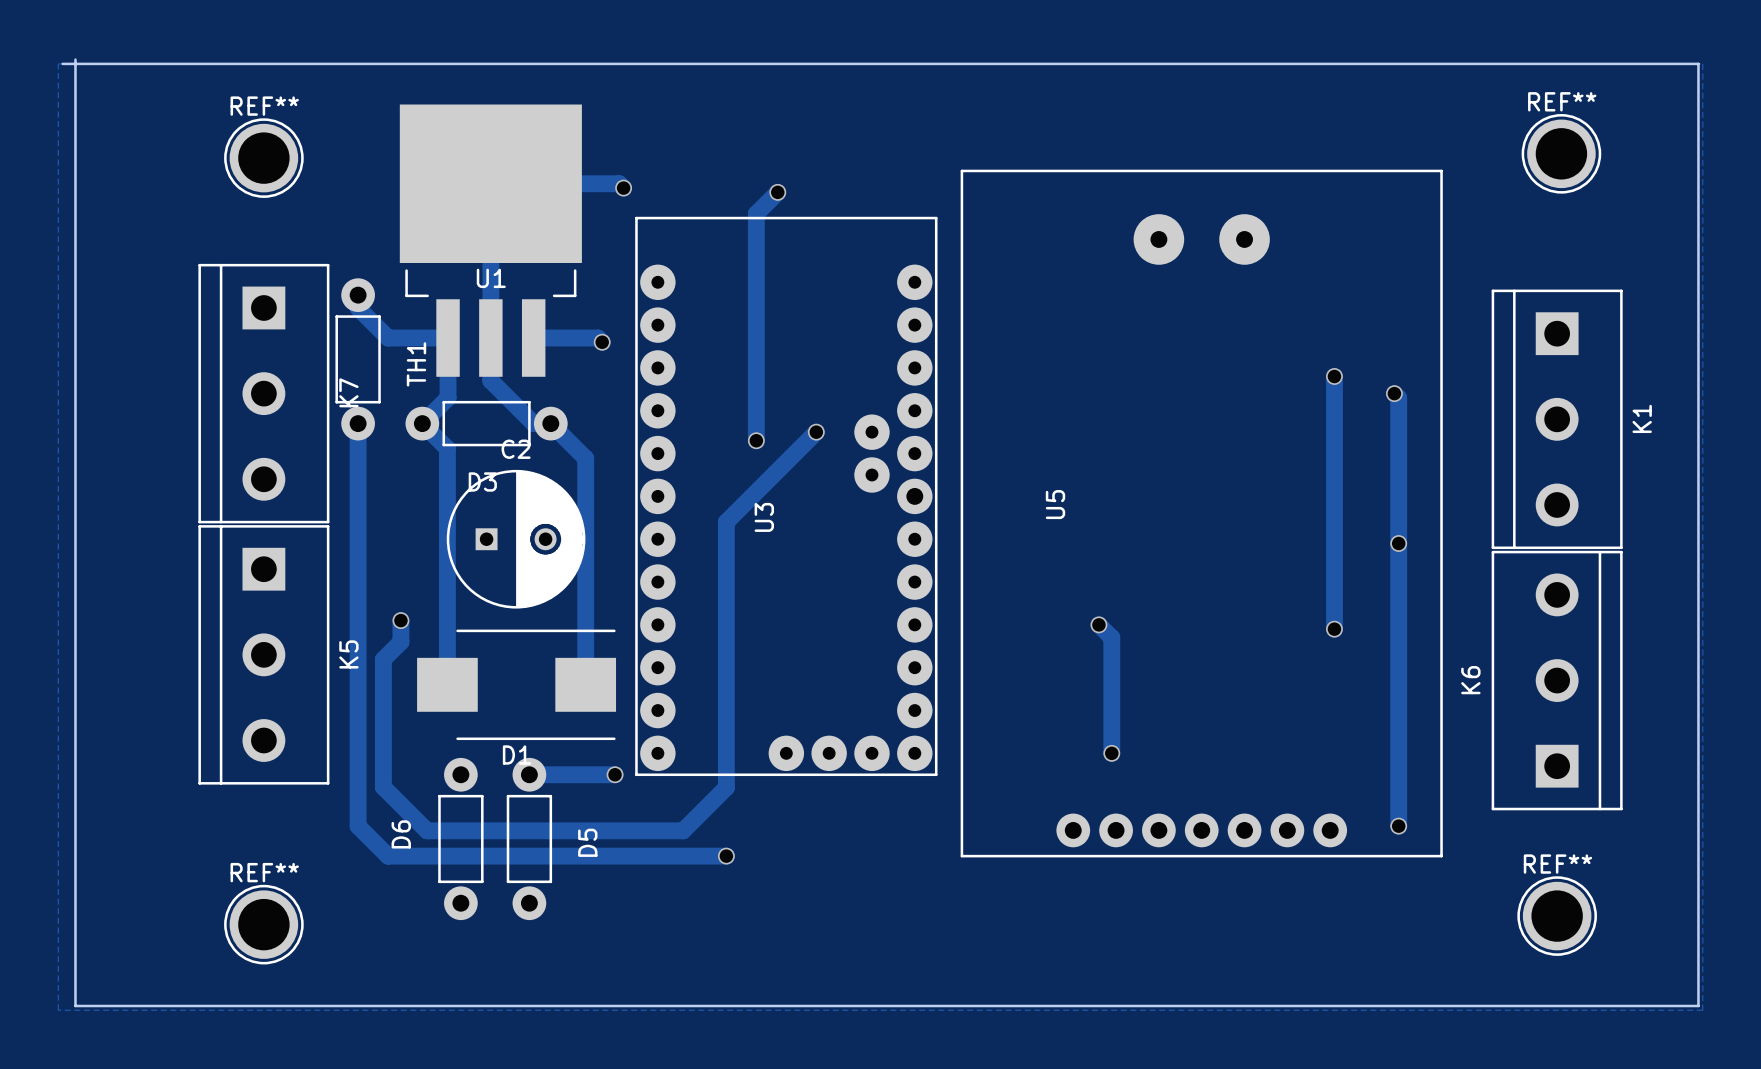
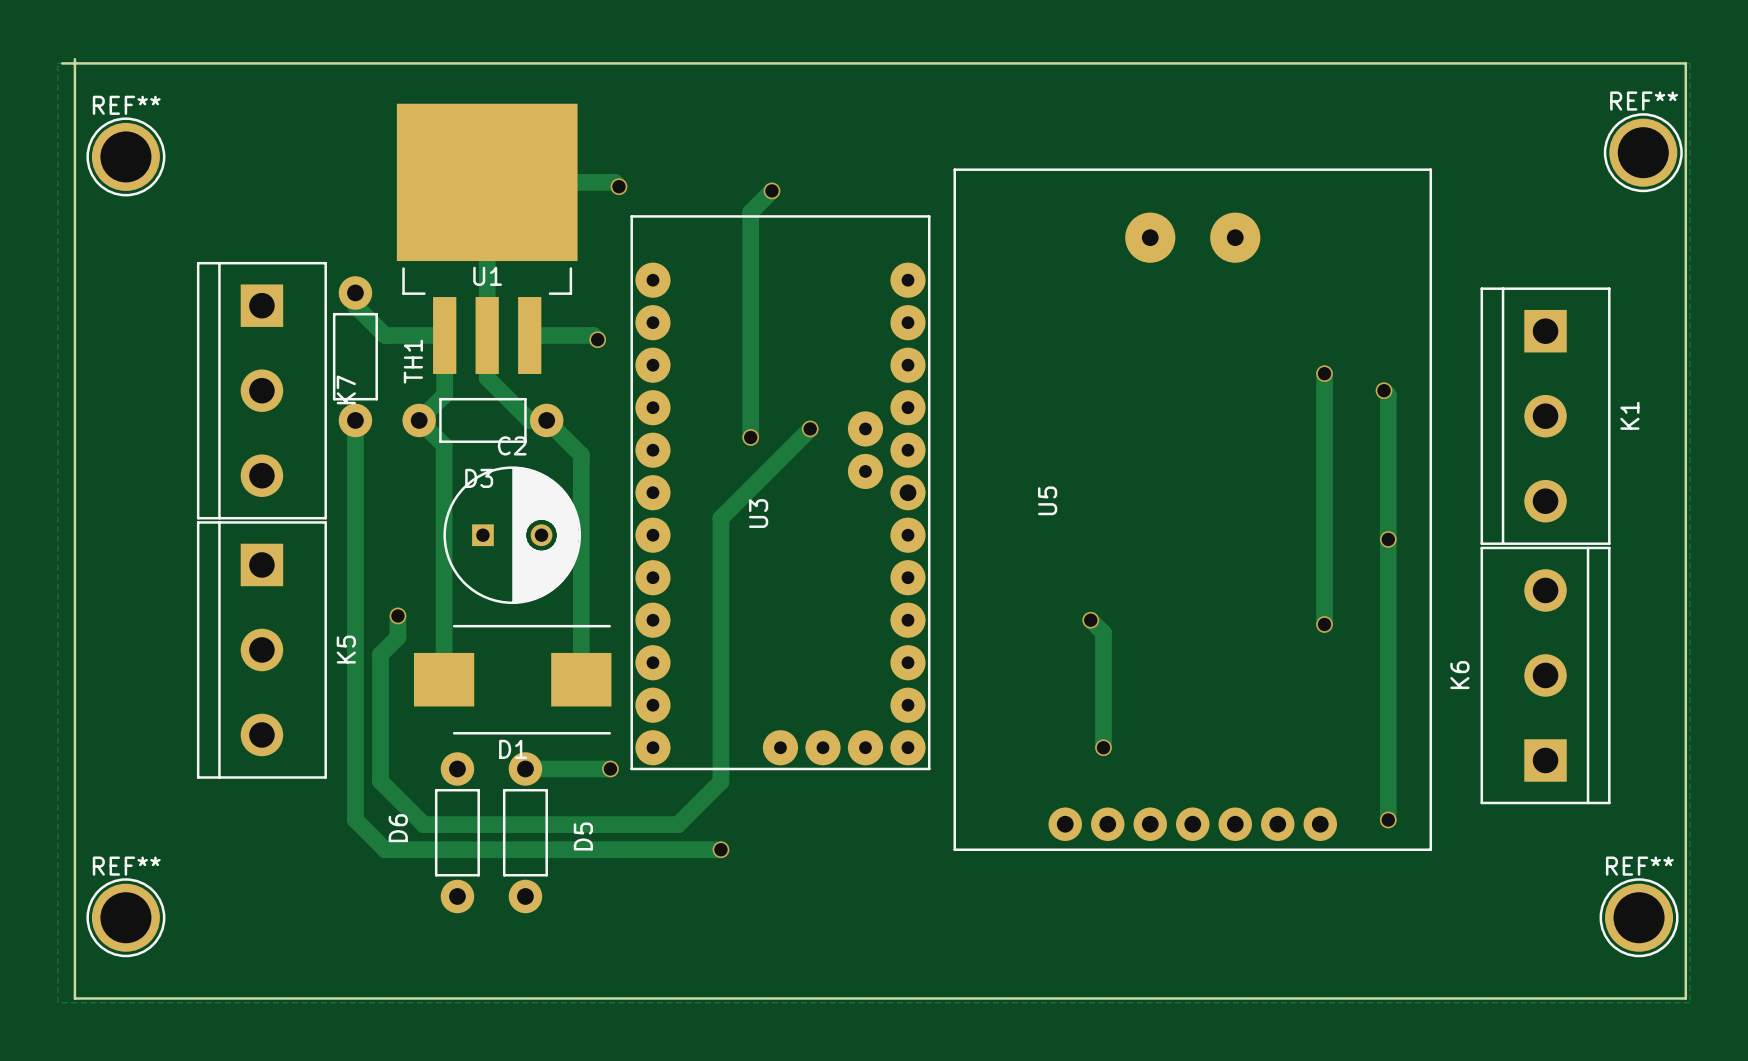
REF** position: (1561, 153) -> (1643, 152)
REF** position: (263, 158) -> (125, 156)
REF** position: (1557, 916) -> (1639, 917)
REF** position: (263, 924) -> (125, 917)

